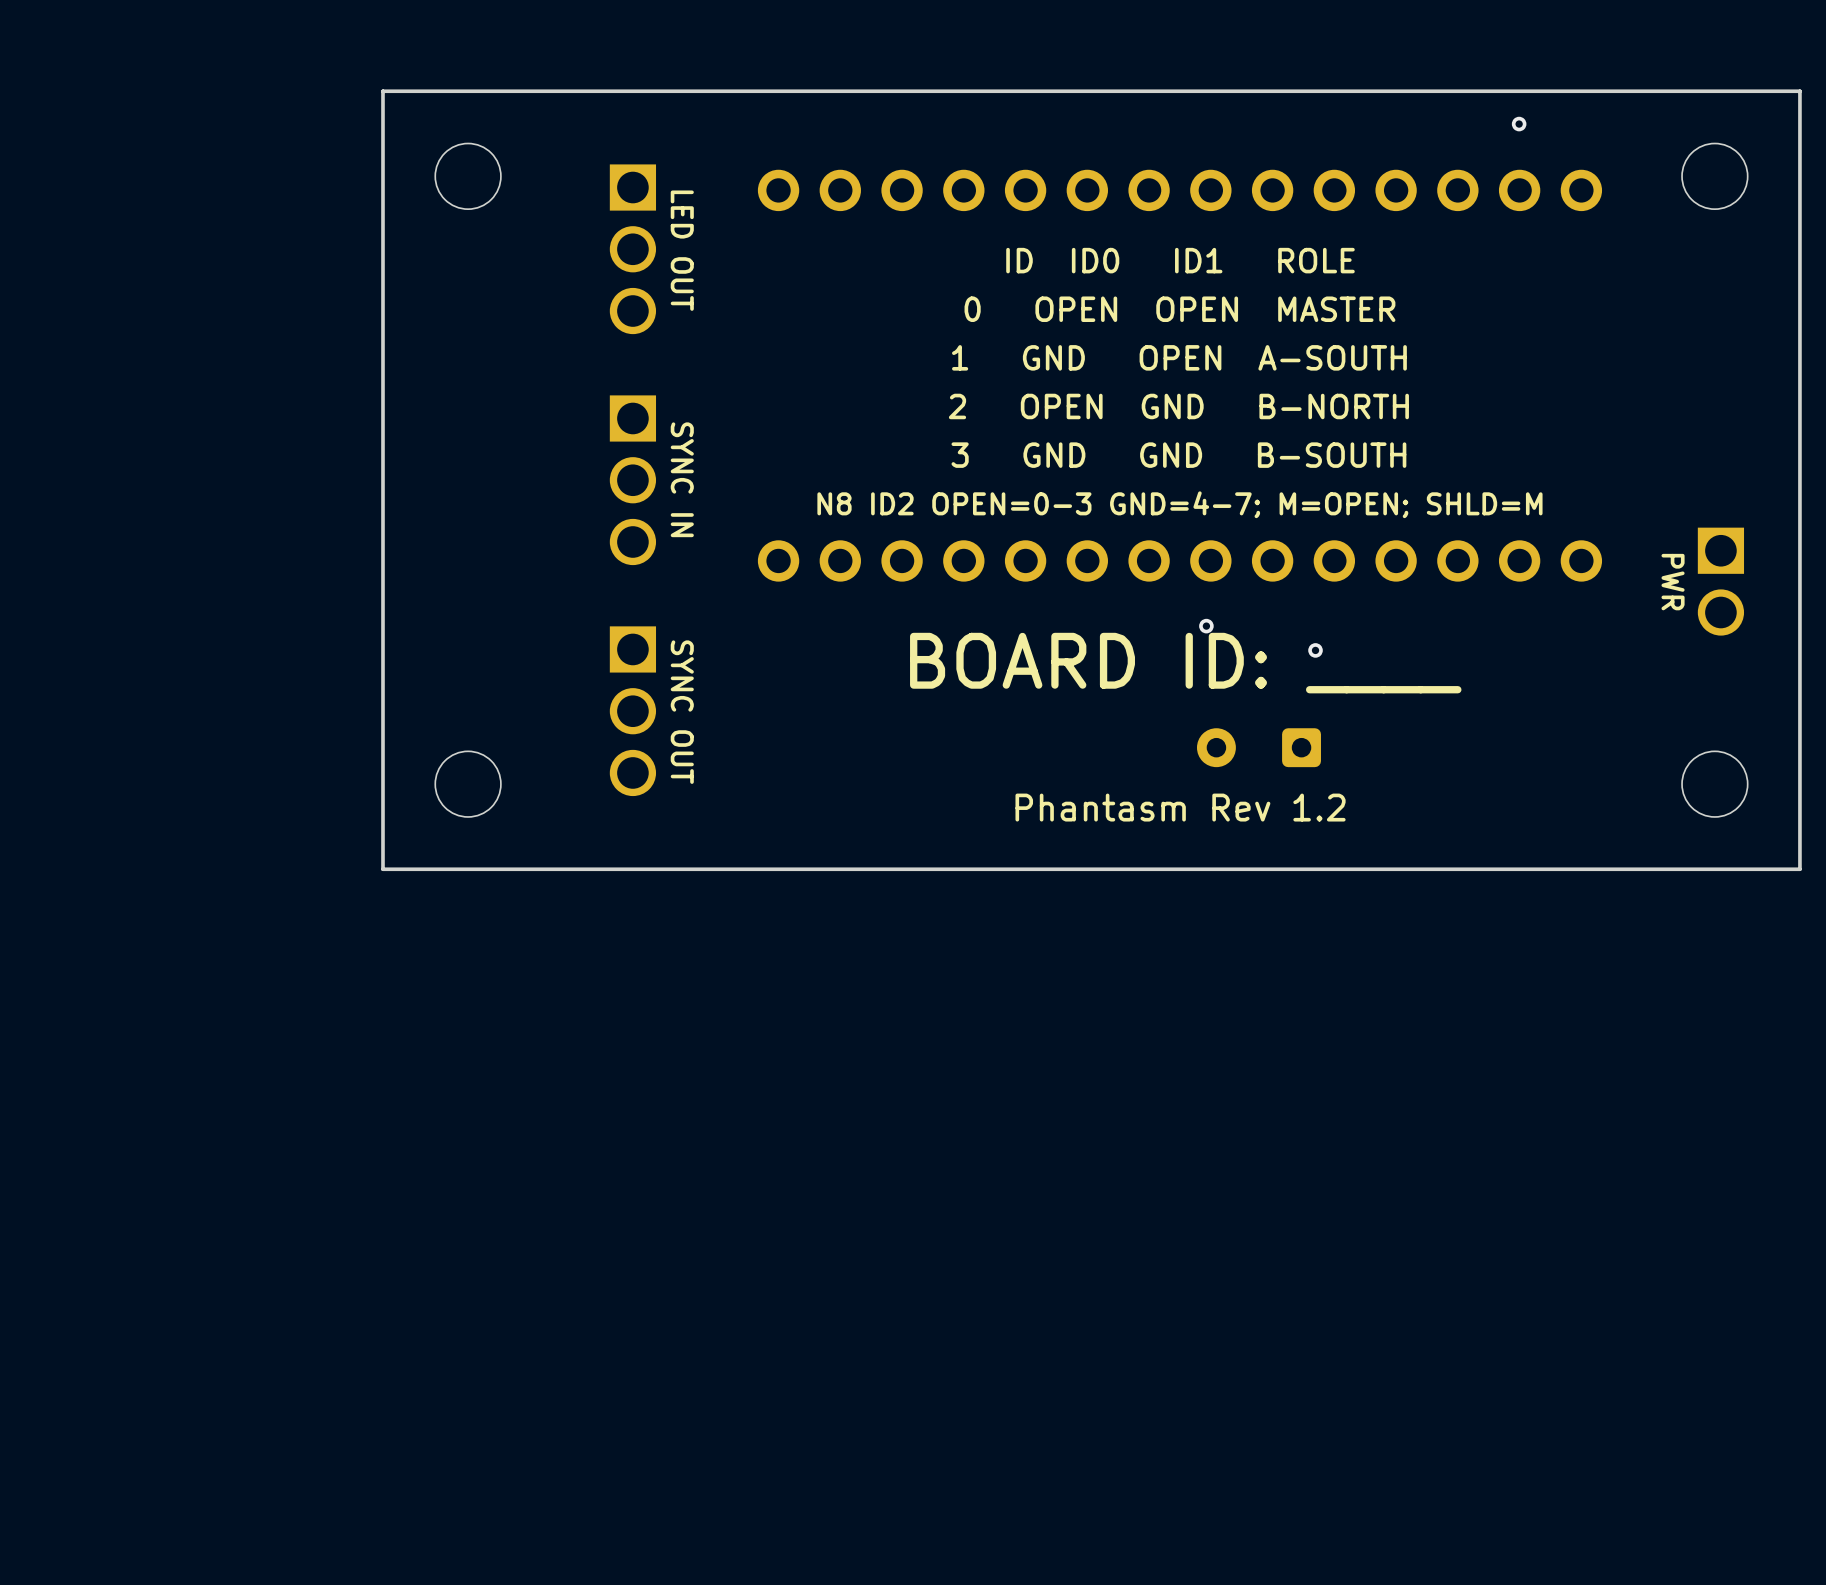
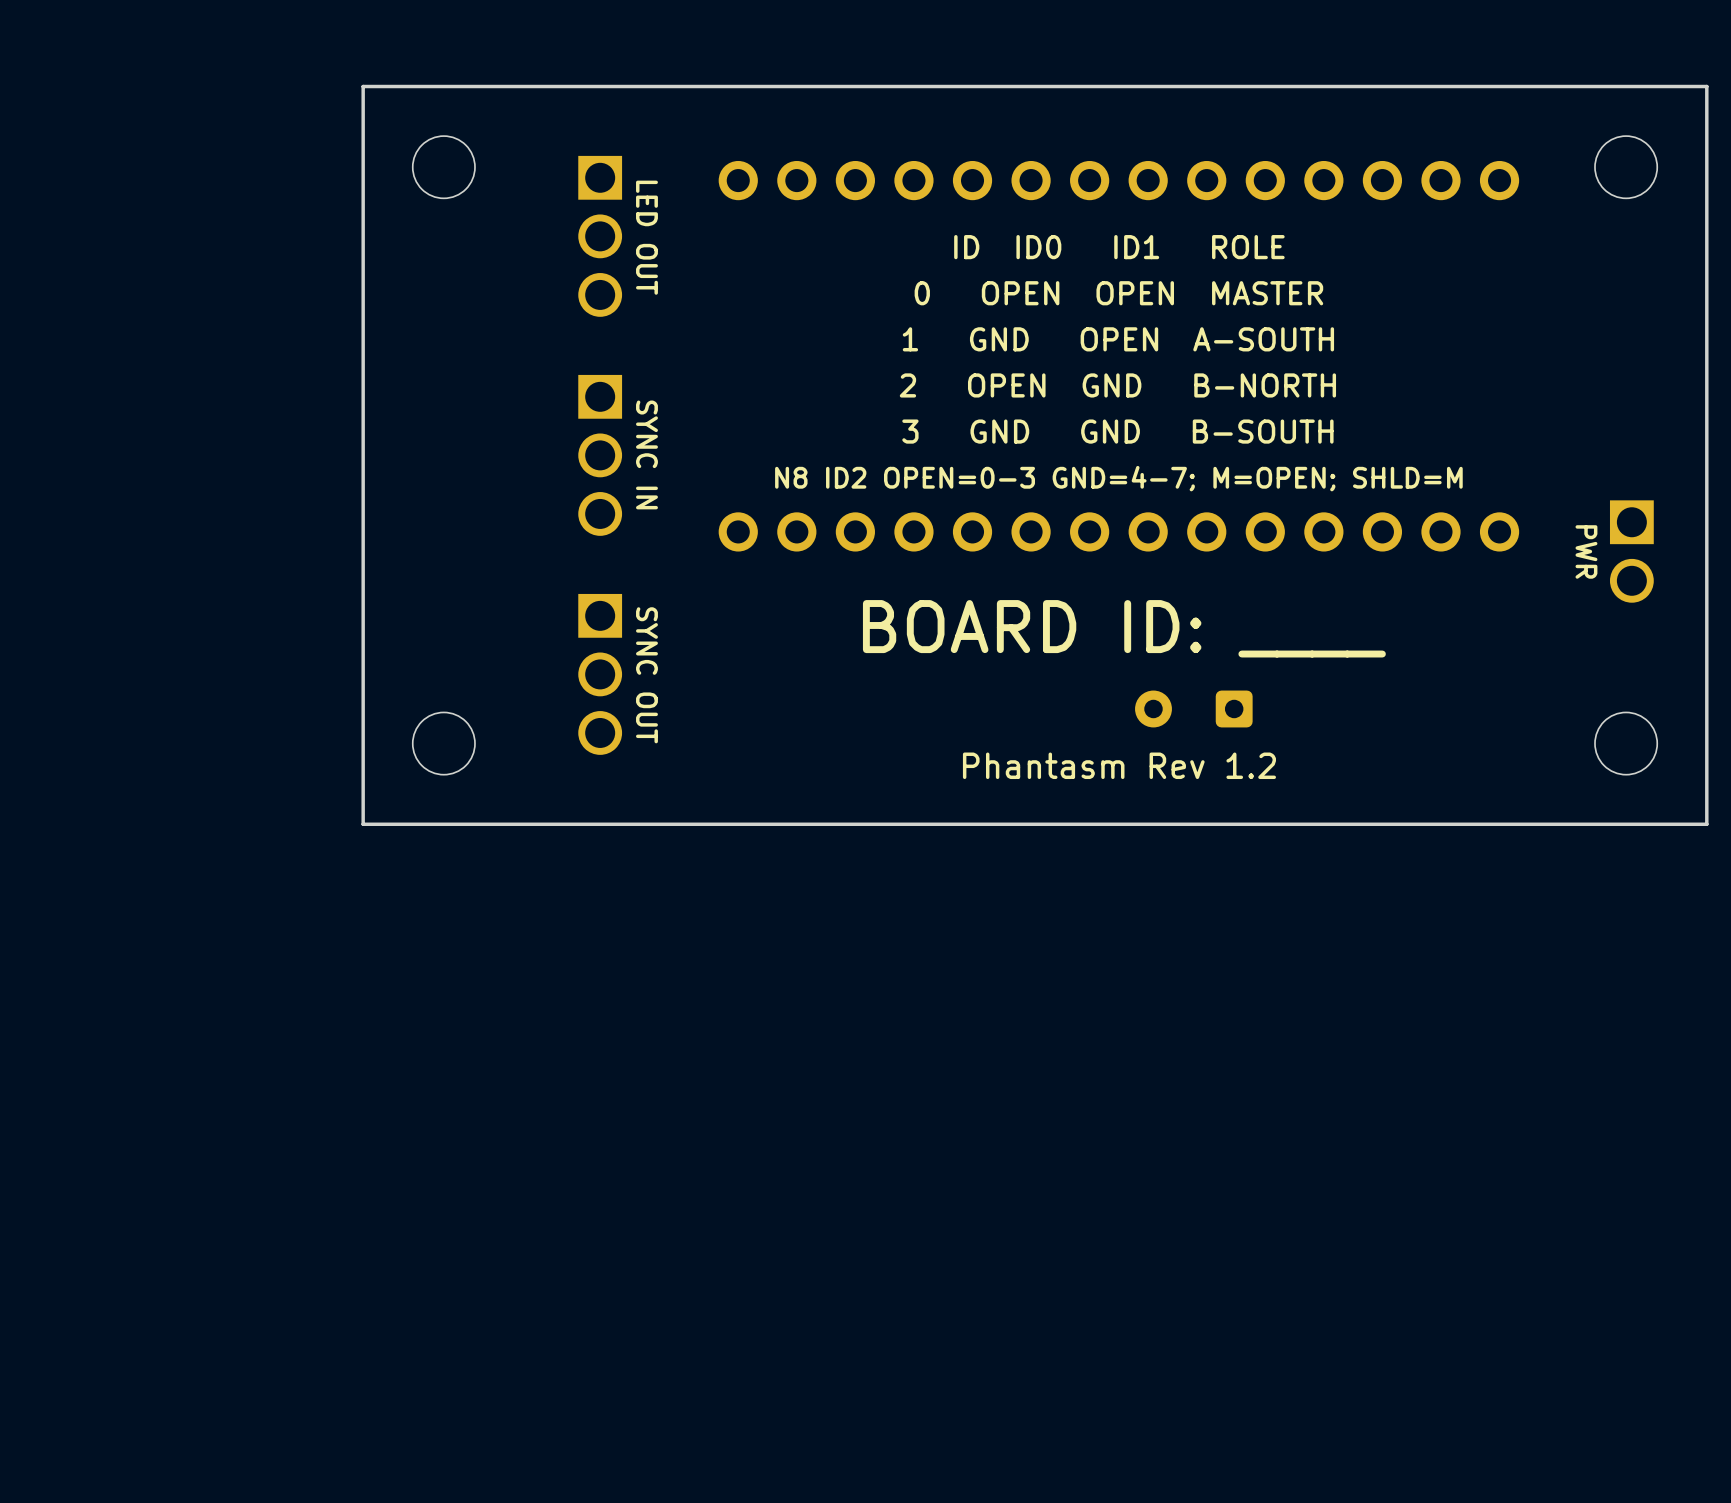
via: (1519, 124) -> none
via: (1206, 626) -> none
via: (1315, 650) -> none

